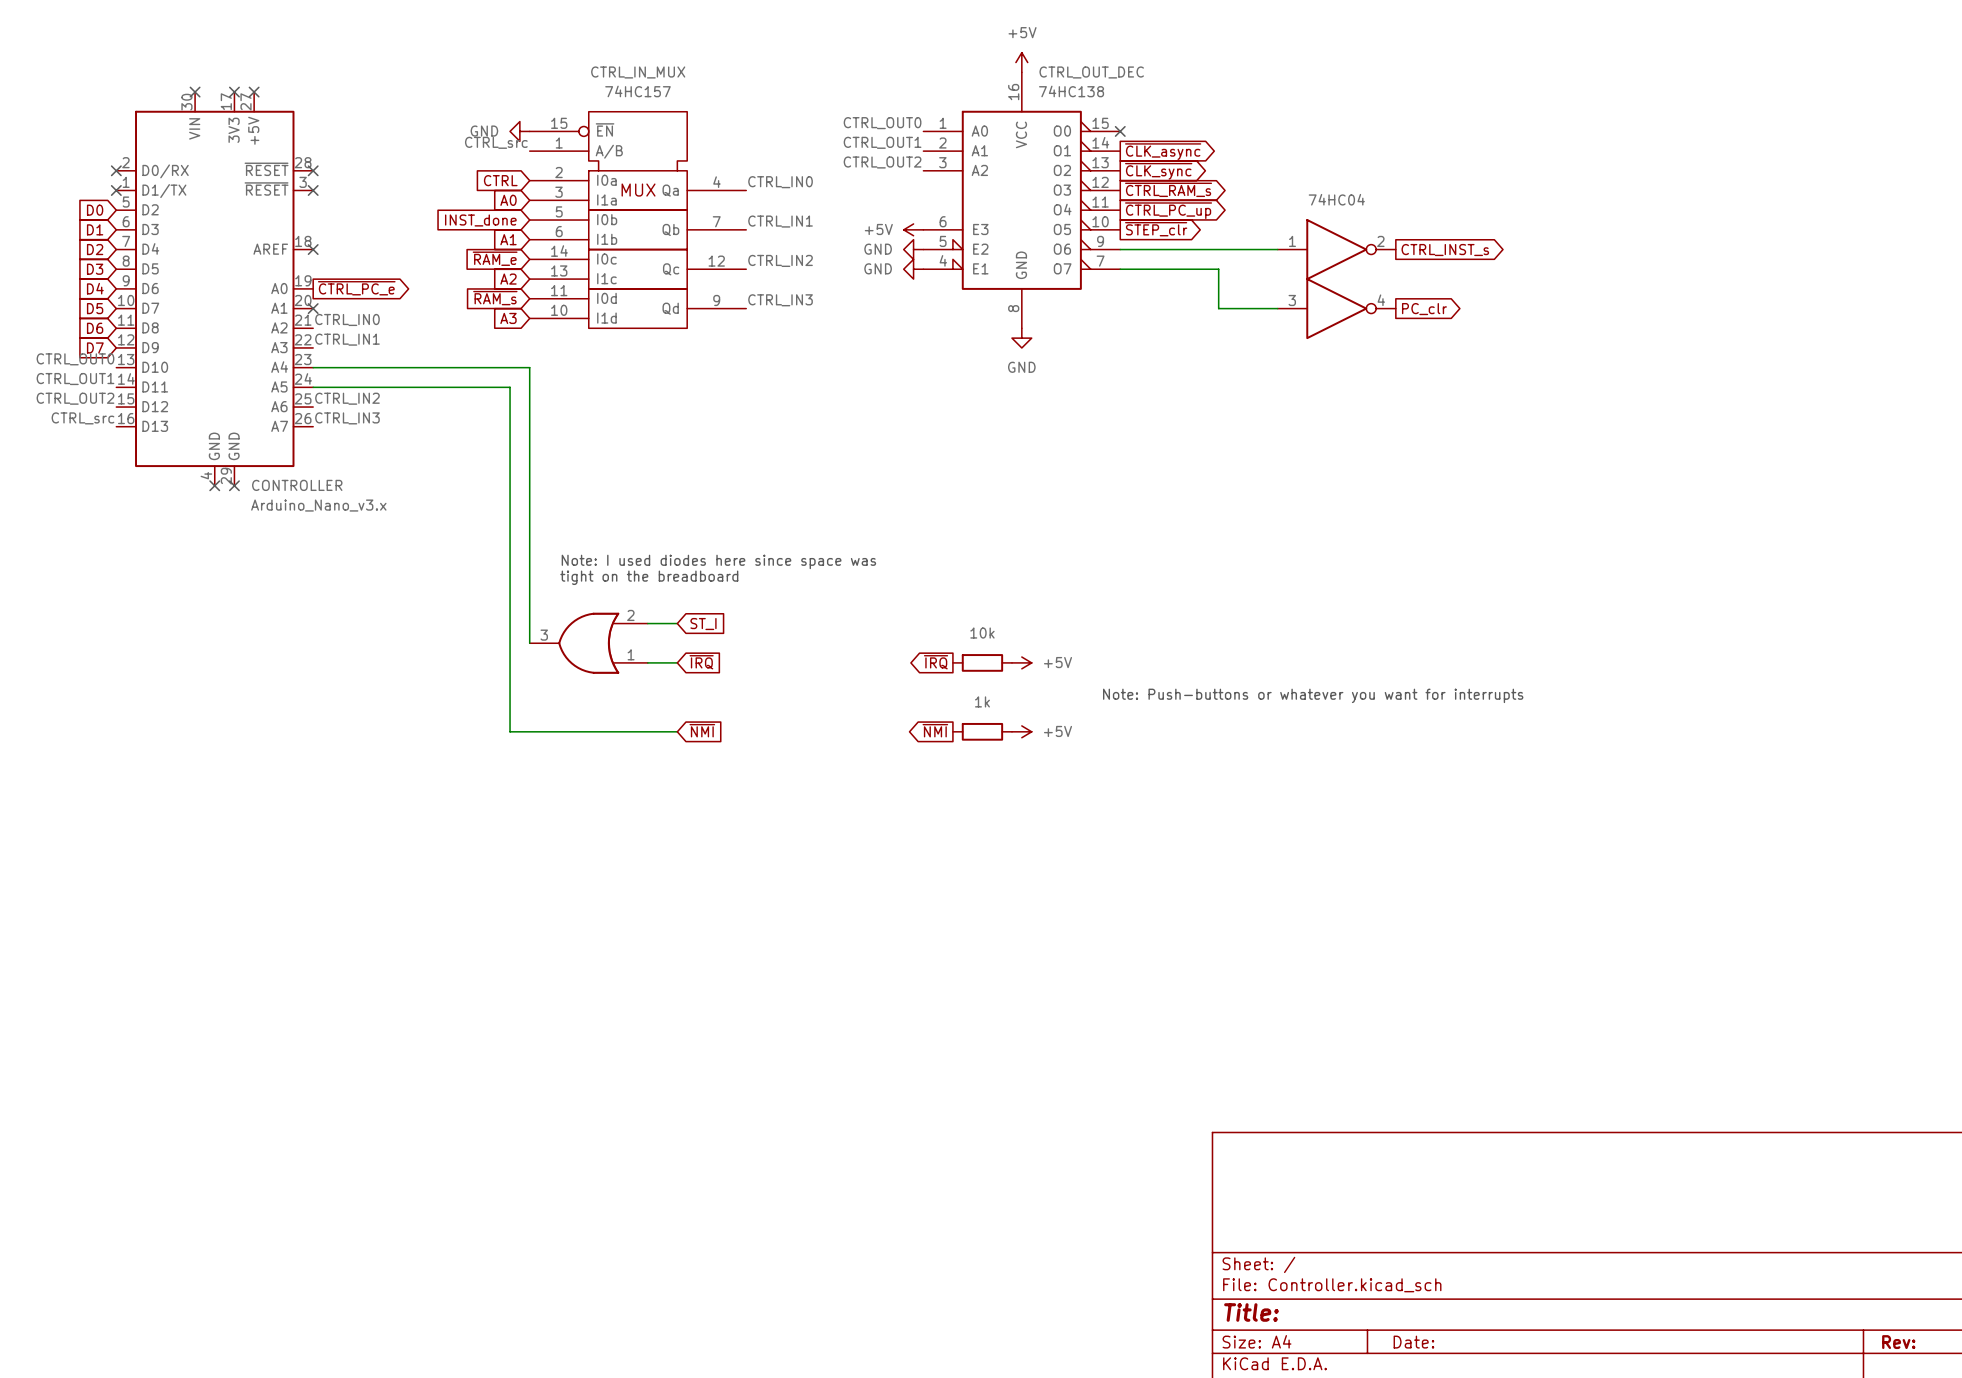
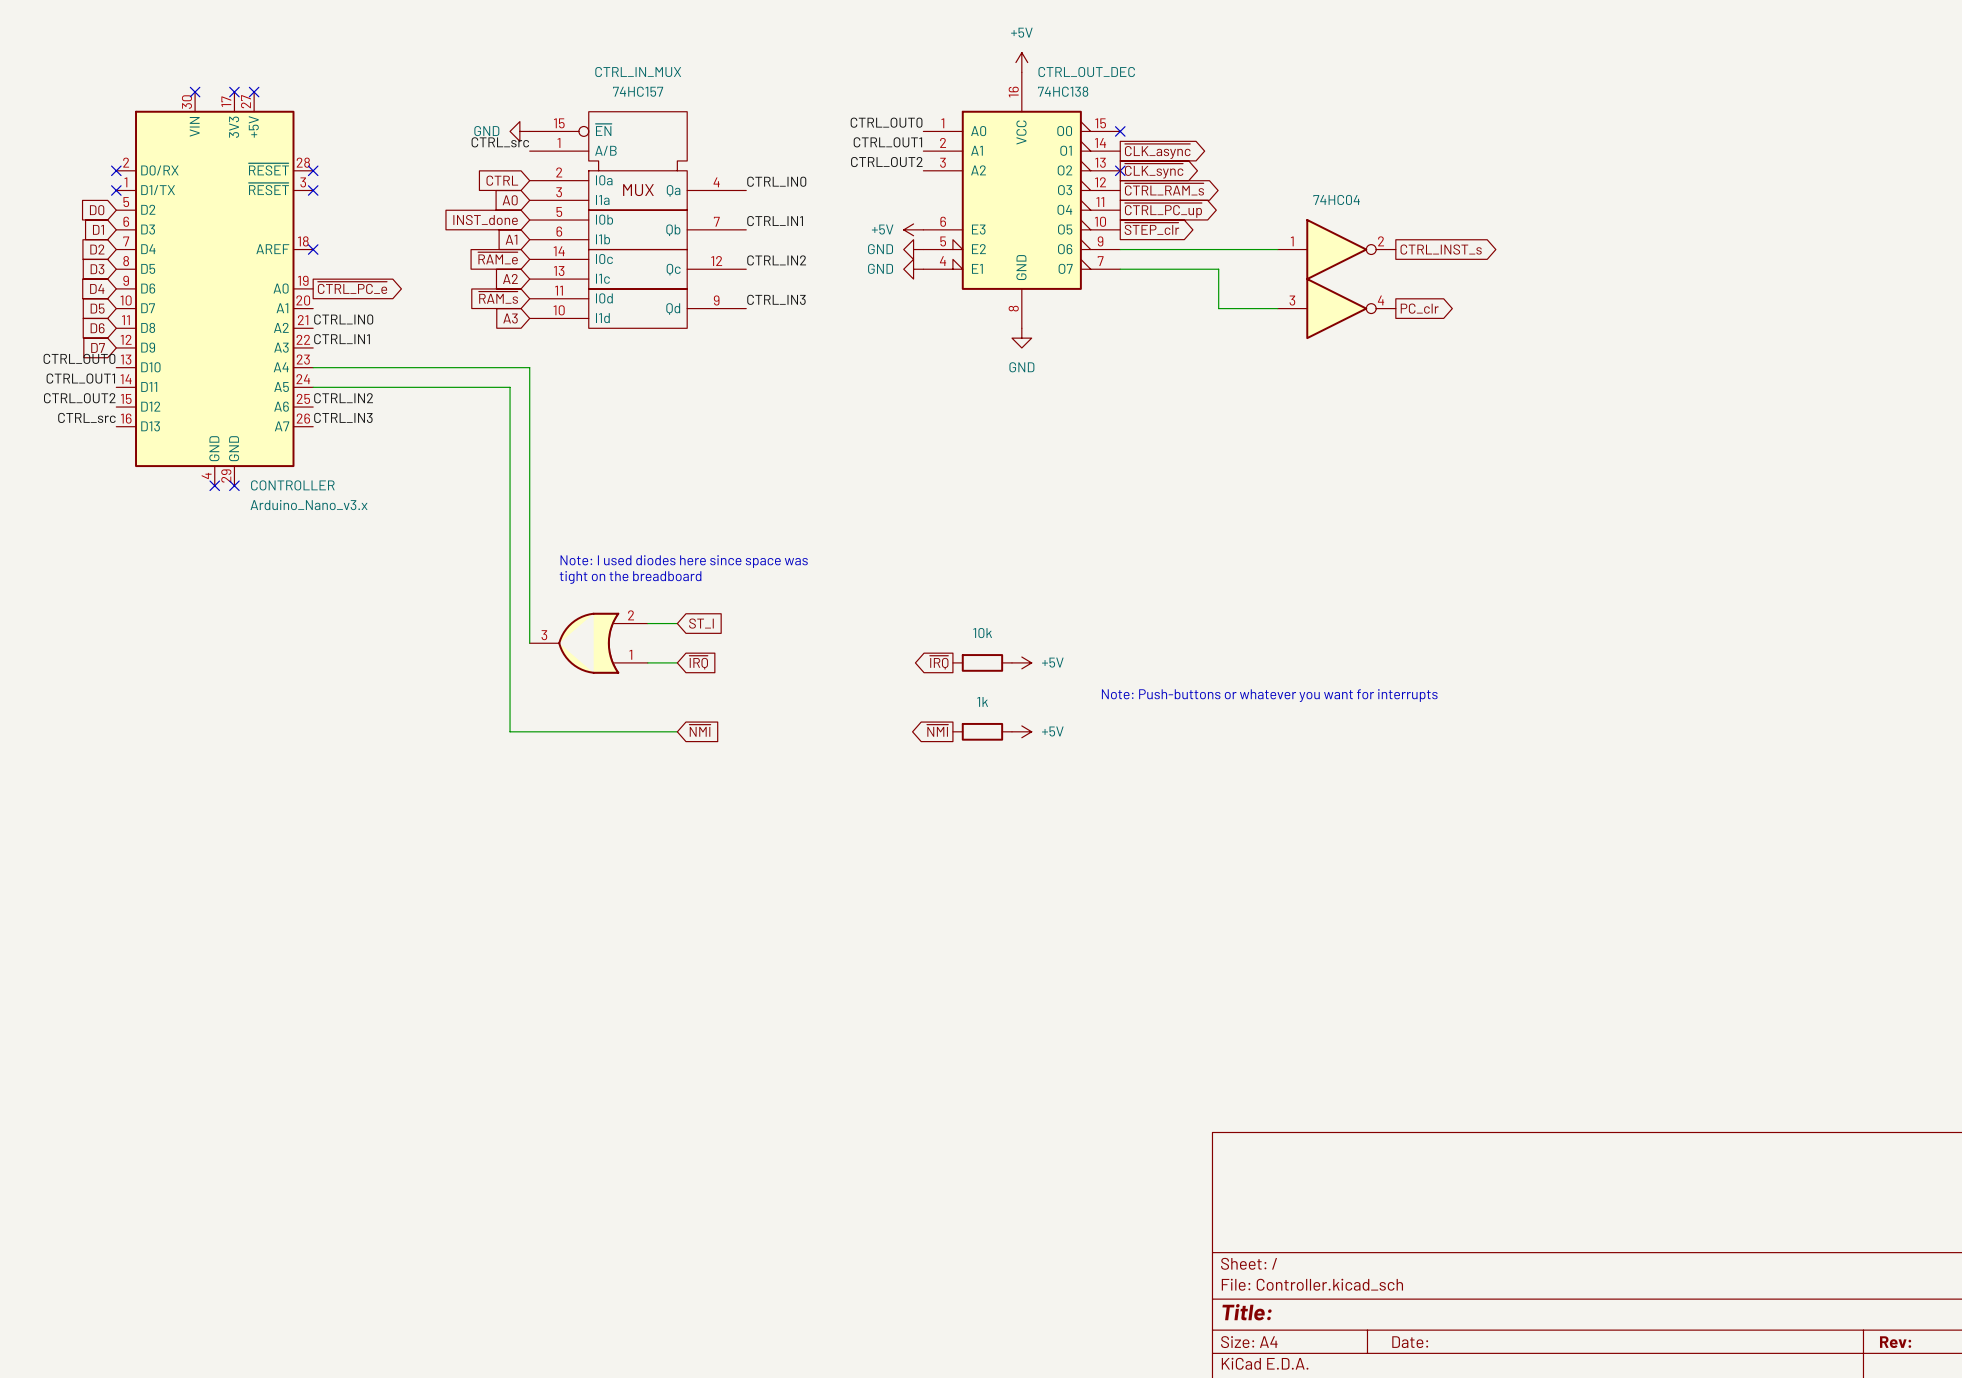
no-connect mark: none -> (1120, 170)
no-connect mark: (313, 308) -> none

